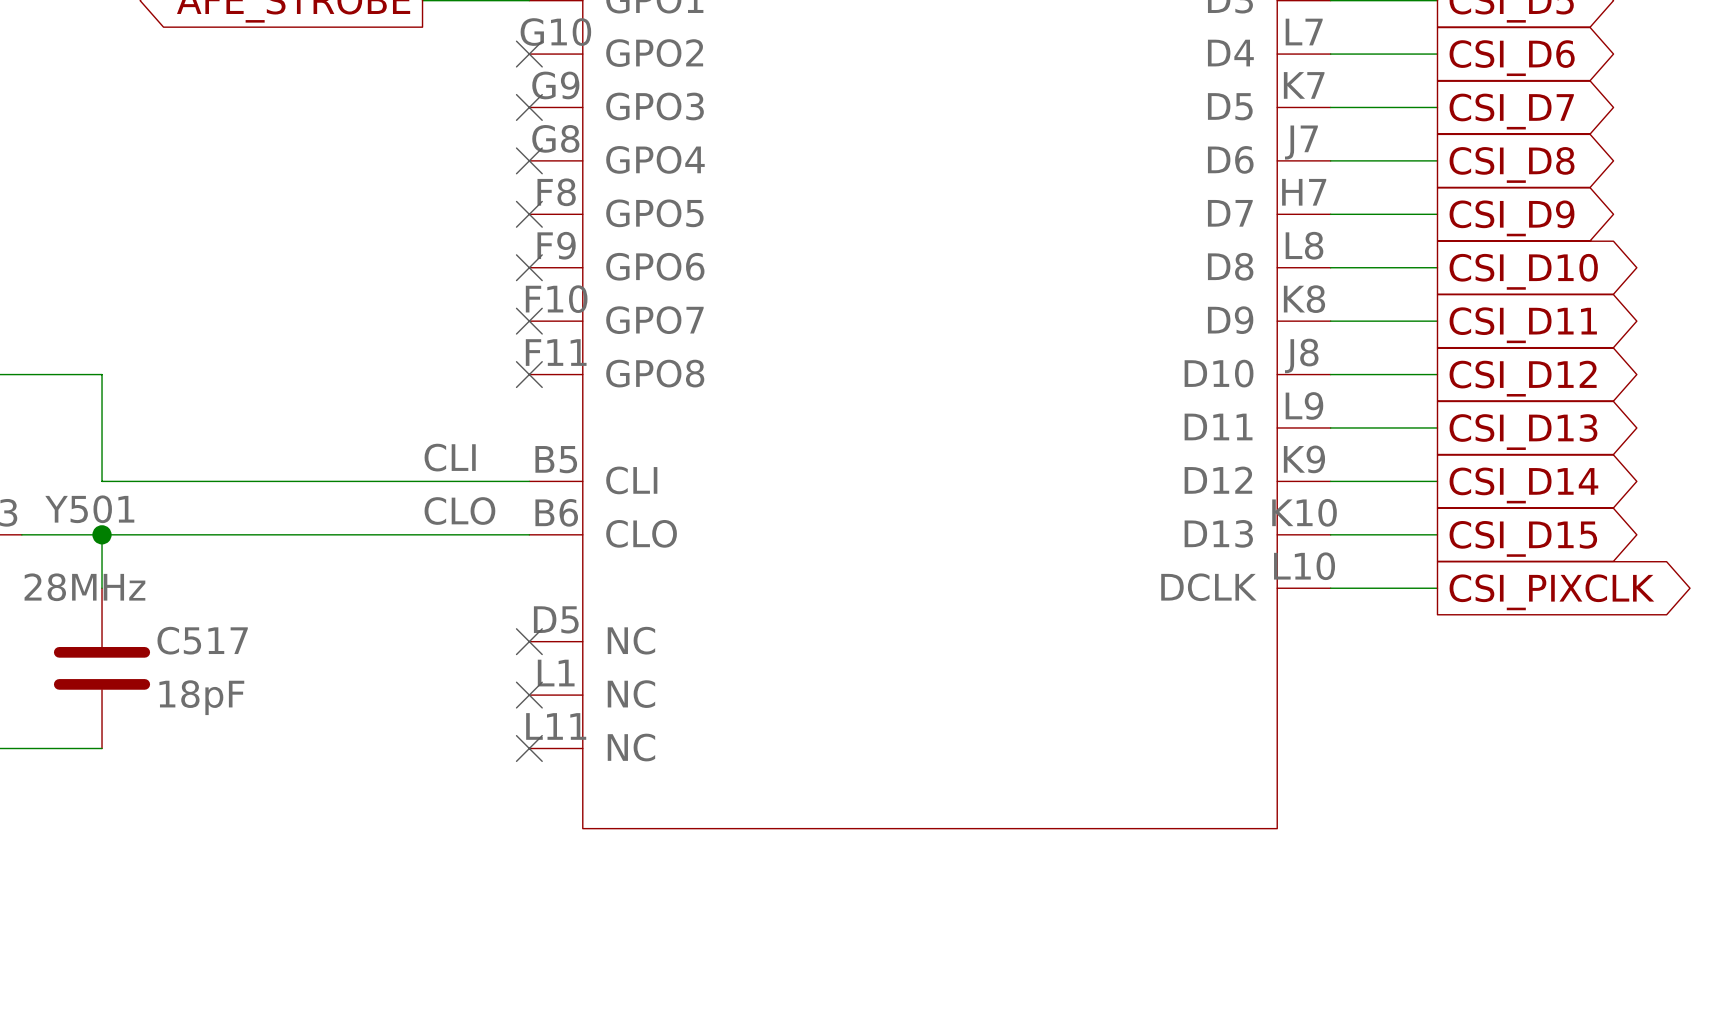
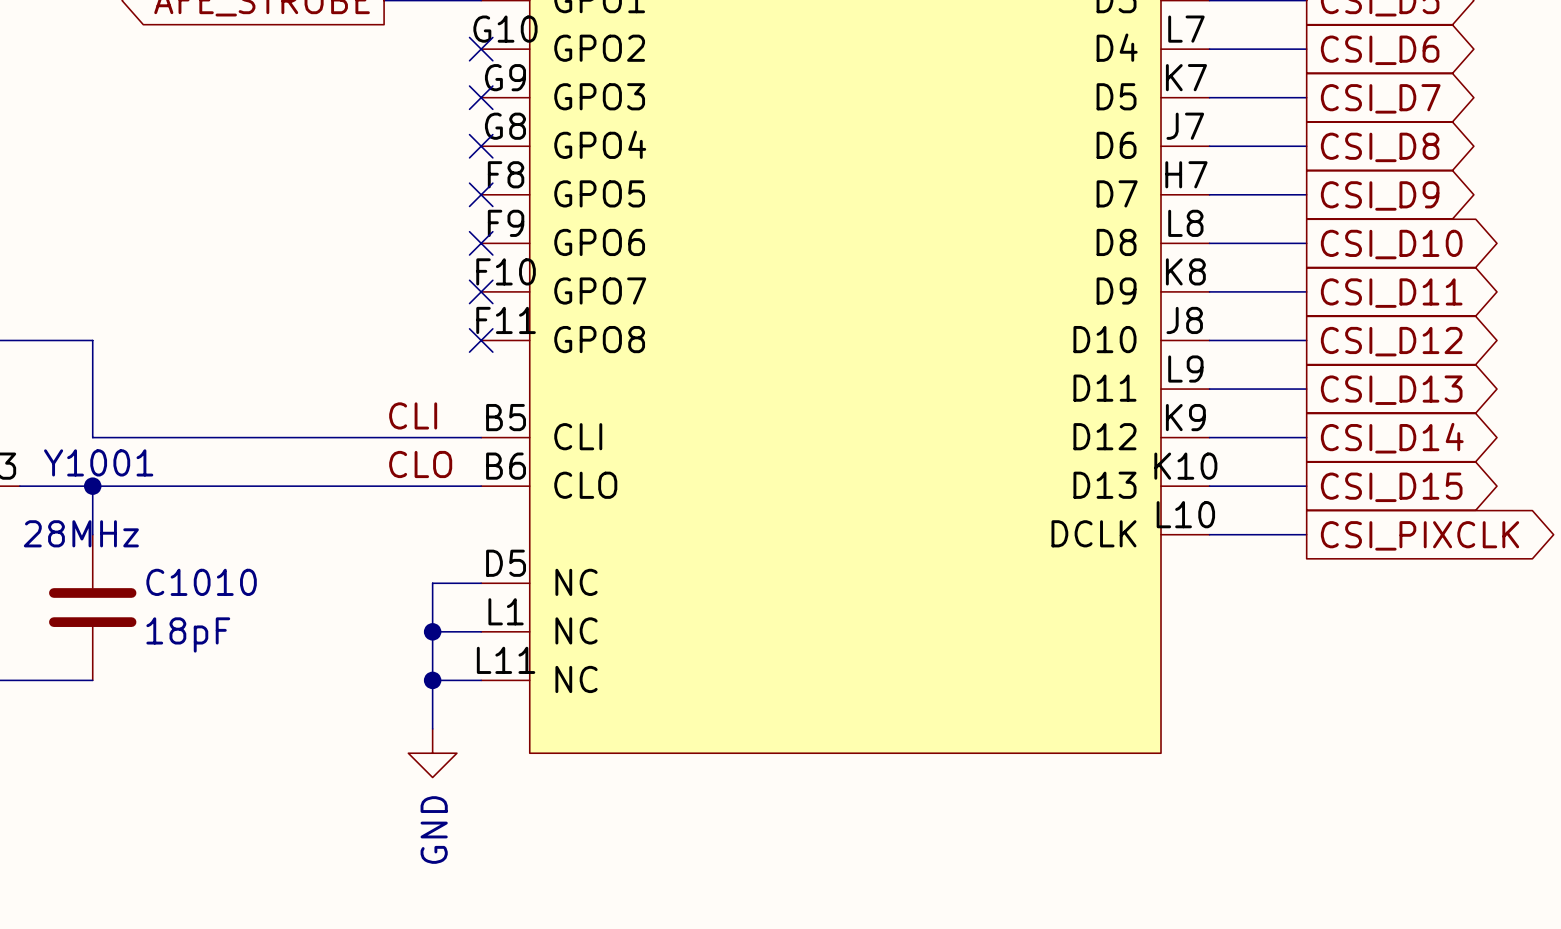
Y501 name: Y501 (89, 509) -> Y1001 (98, 462)
C517 name: C517 (202, 640) -> C1010 (201, 582)
wire: none -> (481, 583) (432, 583) (432, 728)
no-connect mark: (529, 641) -> none
wire: none -> (432, 631) (481, 631)
junction: none -> (432, 631)
no-connect mark: (529, 695) -> none
wire: none -> (432, 680) (481, 680)
junction: none -> (432, 680)
no-connect mark: (529, 748) -> none
power symbol: none -> GND (432, 753)

